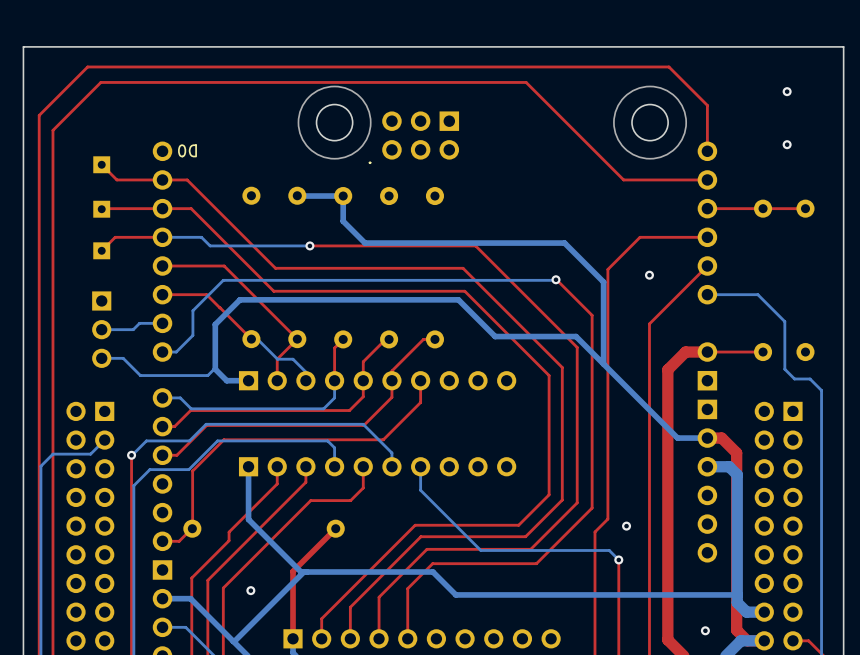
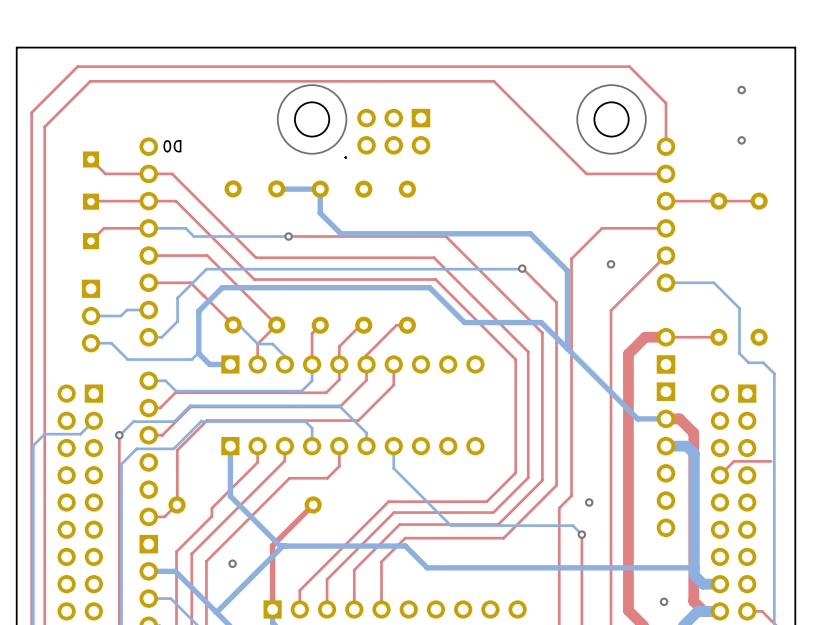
top track: none -> (771, 461) (733, 461) (720, 475)

